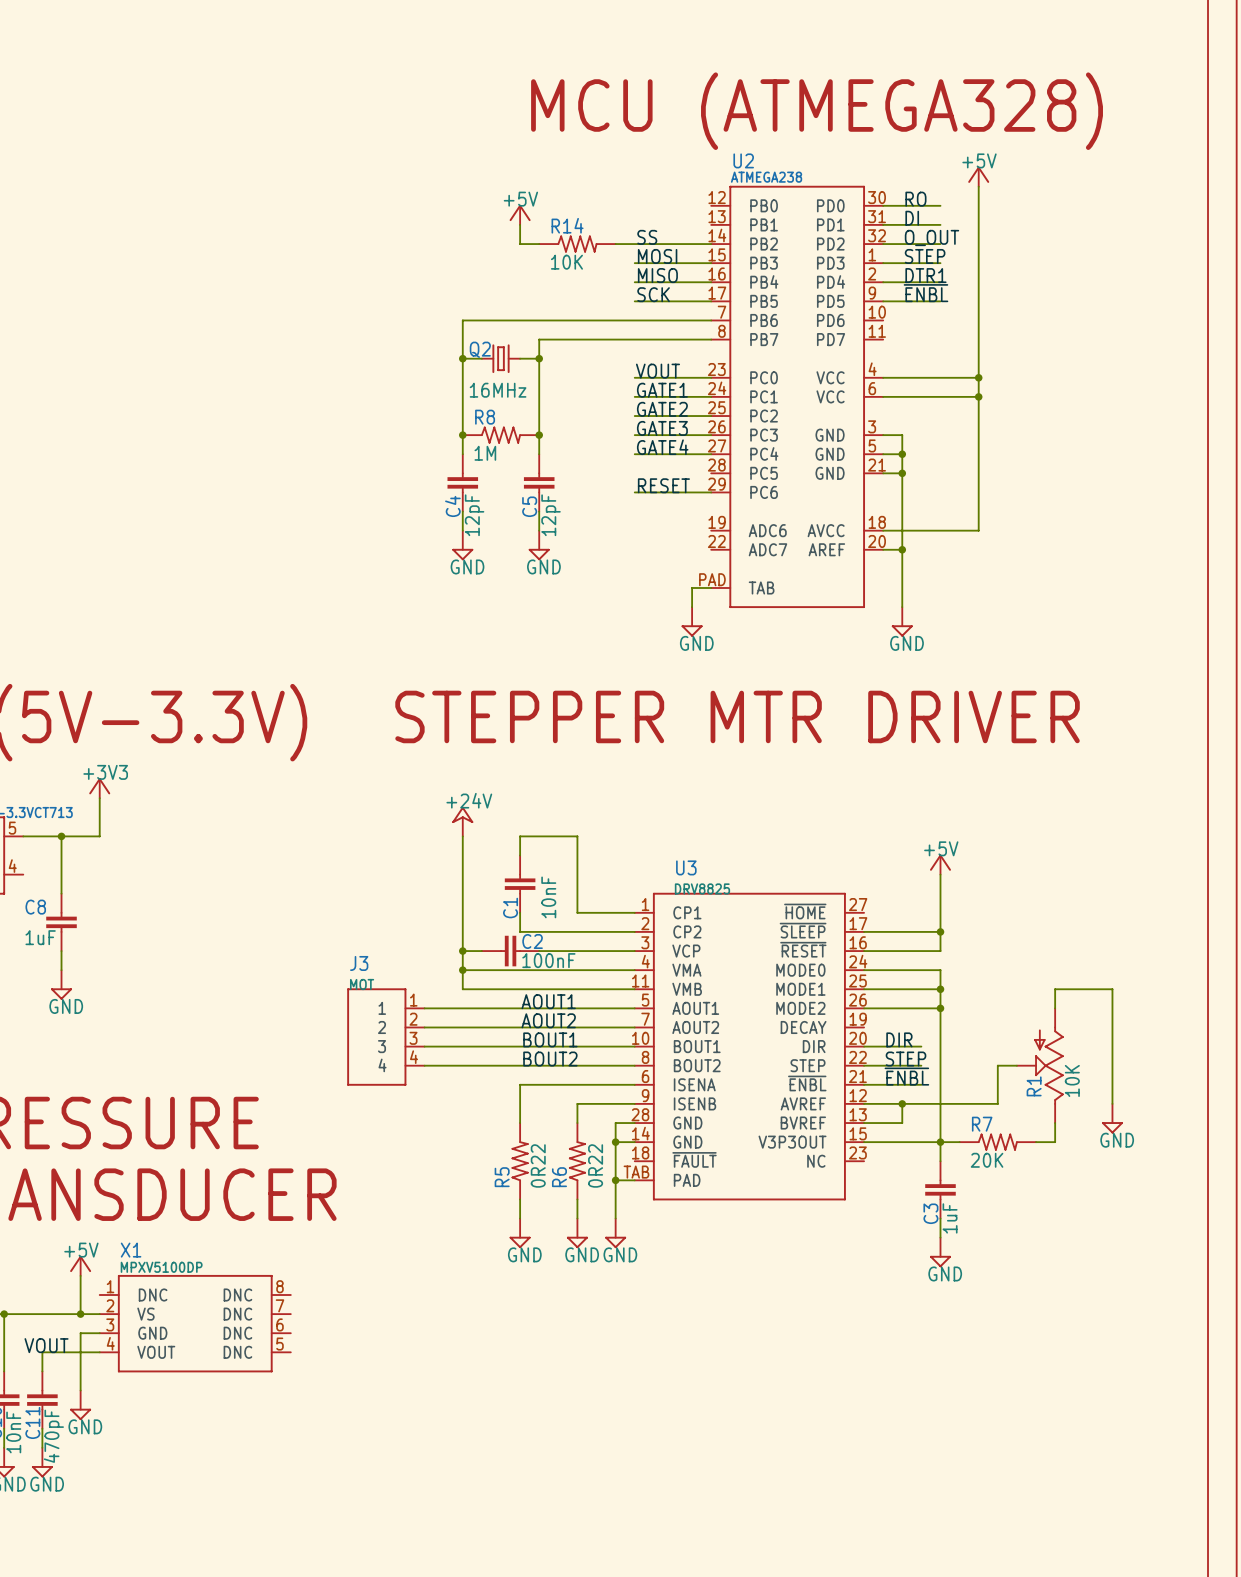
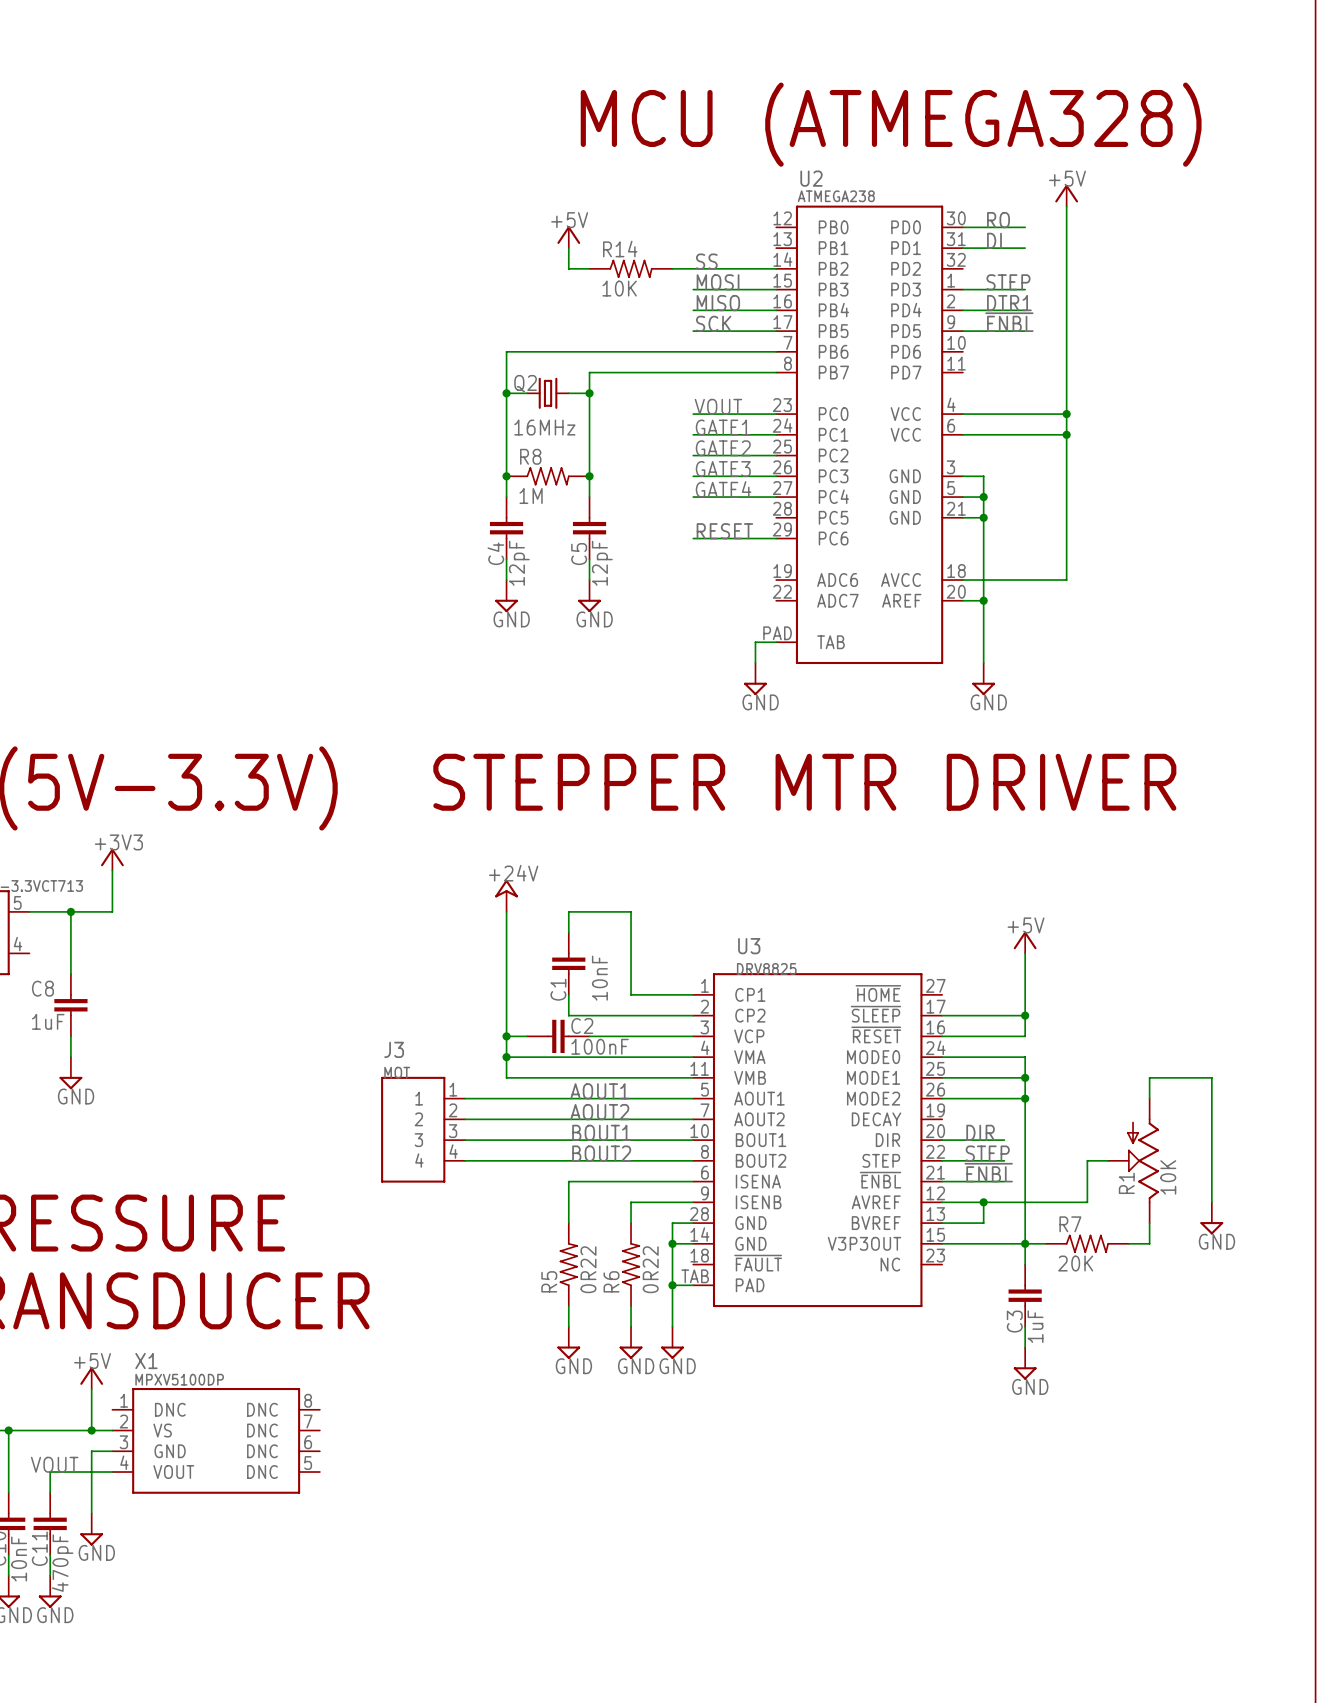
label: O_OUT (931, 237) -> none
wire: (883, 244) (940, 244) -> none

